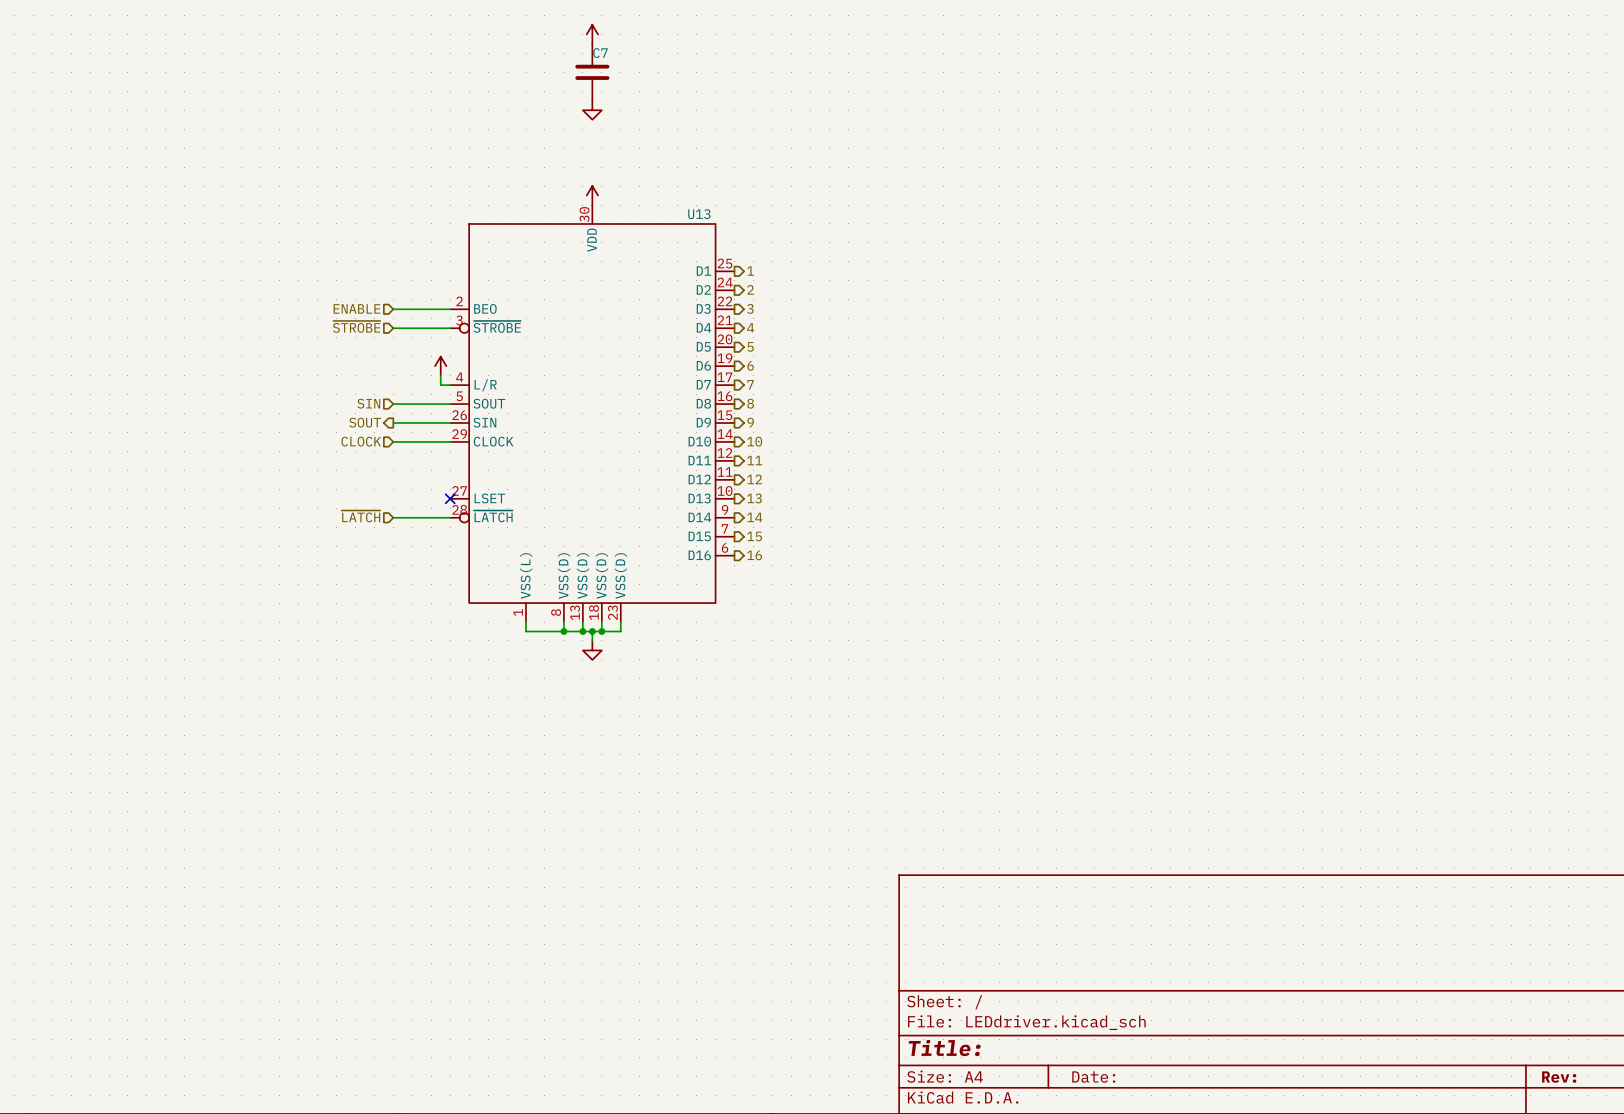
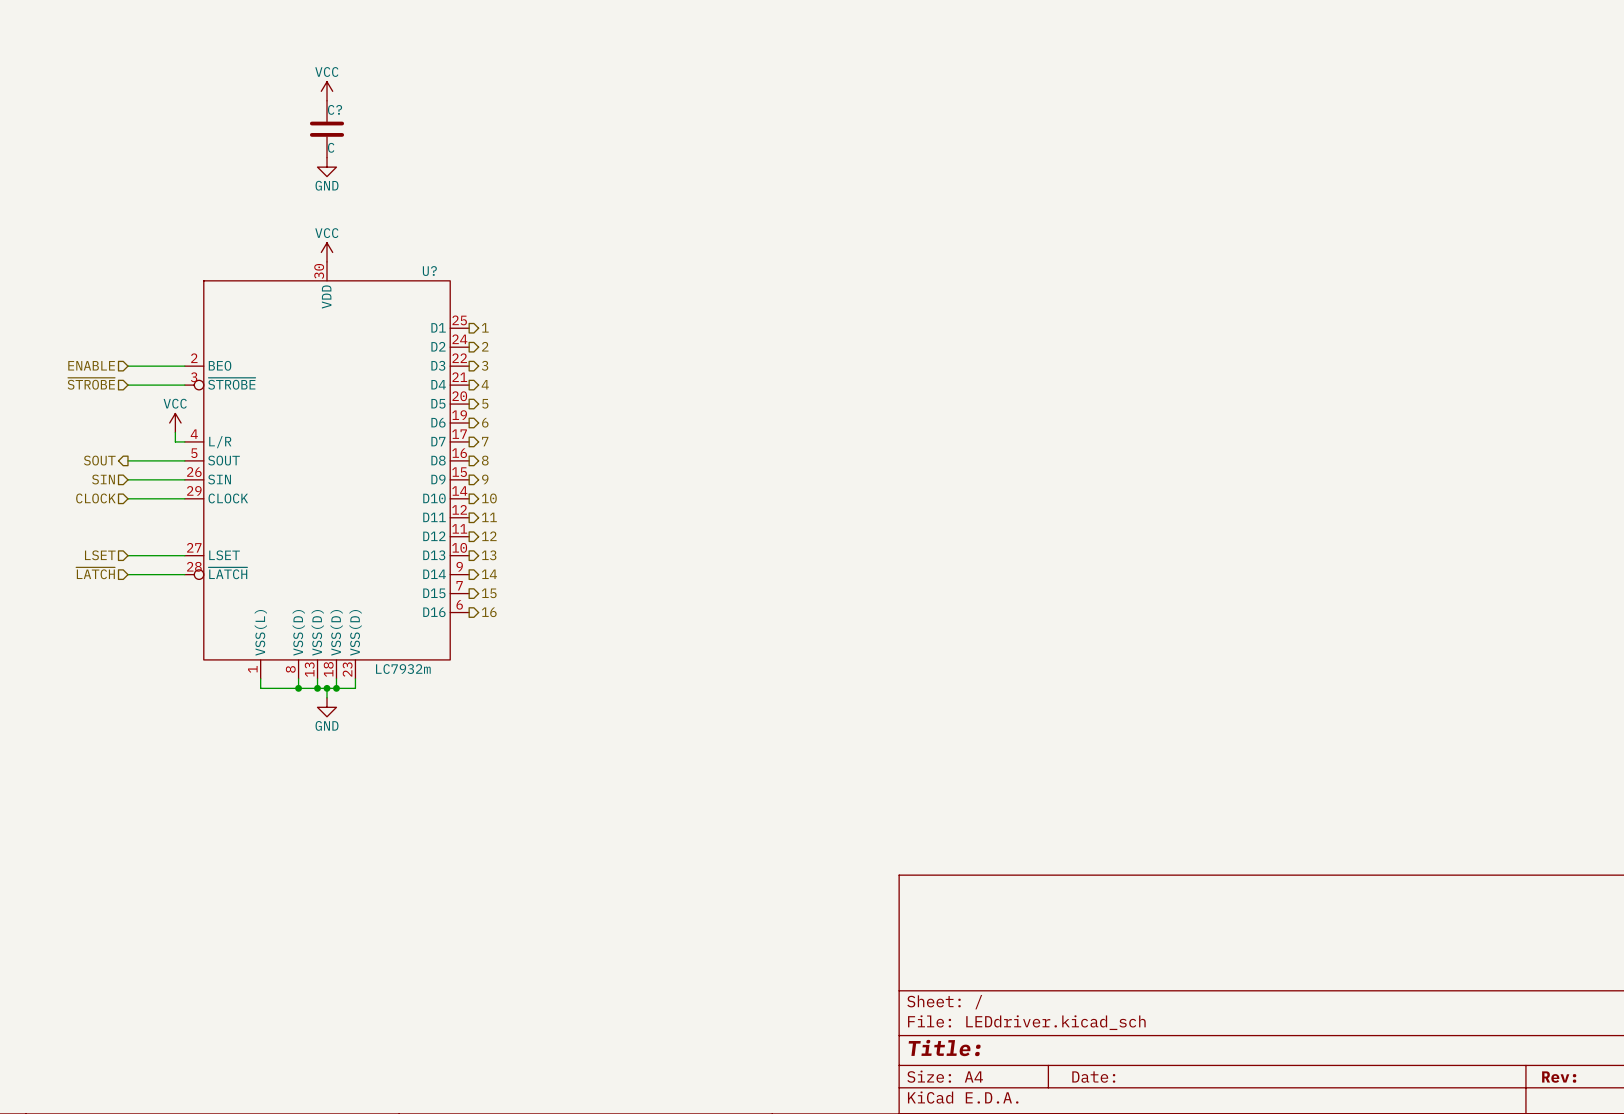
power symbol: (592, 34) -> none
C7: (592, 72) -> none
power symbol: none -> VCC (327, 91)
power symbol: (592, 110) -> none
C?: none -> C (327, 129)
power symbol: none -> GND (327, 167)
power symbol: (592, 195) -> none
power symbol: none -> VCC (327, 252)
hierarchical label: 1 (750, 271) -> none
hierarchical label: 2 (750, 289) -> none
hierarchical label: ENABLE (356, 308) -> none
hierarchical label: 3 (750, 308) -> none
wire: (393, 309) (450, 309) -> none
hierarchical label: ~{STROBE} (356, 326) -> none
hierarchical label: none -> 1 (485, 327)
hierarchical label: 4 (750, 327) -> none
wire: (393, 328) (450, 328) -> none
hierarchical label: none -> 2 (485, 346)
hierarchical label: 5 (750, 346) -> none
hierarchical label: none -> ENABLE (91, 365)
hierarchical label: none -> 3 (485, 365)
hierarchical label: 6 (750, 365) -> none
wire: none -> (127, 366) (184, 366)
power symbol: (440, 366) -> none
wire: (440, 375) (440, 385) (450, 385) -> none
hierarchical label: none -> ~{STROBE} (91, 383)
hierarchical label: none -> 4 (485, 384)
hierarchical label: 7 (750, 384) -> none
wire: none -> (127, 385) (184, 385)
U13: (559, 389) -> none
hierarchical label: SIN (368, 403) -> none
hierarchical label: none -> 5 (485, 403)
hierarchical label: 8 (750, 403) -> none
wire: (393, 404) (450, 404) -> none
hierarchical label: SOUT (365, 422) -> none
hierarchical label: none -> 6 (485, 422)
hierarchical label: 9 (750, 422) -> none
power symbol: none -> VCC (175, 423)
wire: (393, 423) (450, 423) -> none
wire: none -> (175, 432) (175, 441) (184, 441)
hierarchical label: CLOCK (361, 441) -> none
wire: (393, 441) (450, 441) -> none
hierarchical label: none -> 7 (485, 441)
hierarchical label: 10 (754, 441) -> none
U?: none -> LC7932m (293, 446)
hierarchical label: none -> SOUT (99, 460)
wire: none -> (127, 460) (184, 460)
hierarchical label: none -> 8 (485, 460)
hierarchical label: 11 (754, 460) -> none
hierarchical label: none -> SIN (103, 479)
wire: none -> (127, 479) (184, 479)
hierarchical label: none -> 9 (485, 479)
hierarchical label: 12 (754, 479) -> none
hierarchical label: none -> CLOCK (95, 498)
wire: none -> (127, 498) (184, 498)
no-connect mark: (450, 498) -> none
hierarchical label: none -> 10 (489, 498)
hierarchical label: 13 (754, 498) -> none
hierarchical label: ~{LATCH} (360, 516) -> none
wire: (393, 517) (450, 517) -> none
hierarchical label: none -> 11 (489, 517)
hierarchical label: 14 (754, 517) -> none
hierarchical label: none -> 12 (489, 536)
hierarchical label: 15 (754, 536) -> none
hierarchical label: none -> LSET (100, 555)
wire: none -> (127, 555) (184, 555)
hierarchical label: none -> 13 (489, 555)
hierarchical label: 16 (754, 555) -> none
hierarchical label: none -> ~{LATCH} (95, 573)
wire: none -> (127, 574) (184, 574)
hierarchical label: none -> 14 (489, 574)
hierarchical label: none -> 15 (489, 593)
hierarchical label: none -> 16 (489, 612)
wire: (526, 622) (526, 631) (620, 631) (620, 622) -> none
wire: (563, 622) (563, 631) -> none
wire: (582, 622) (582, 631) -> none
wire: (601, 622) (601, 631) -> none
junction: (563, 631) -> none
junction: (582, 631) -> none
wire: (592, 631) (592, 640) -> none
junction: (592, 631) -> none
junction: (601, 631) -> none
power symbol: (592, 650) -> none
wire: none -> (260, 678) (260, 688) (355, 688) (355, 678)
wire: none -> (298, 678) (298, 688)
wire: none -> (317, 678) (317, 688)
wire: none -> (336, 678) (336, 688)
junction: none -> (298, 688)
junction: none -> (317, 688)
wire: none -> (327, 688) (327, 697)
junction: none -> (327, 688)
junction: none -> (336, 688)
power symbol: none -> GND (327, 707)

